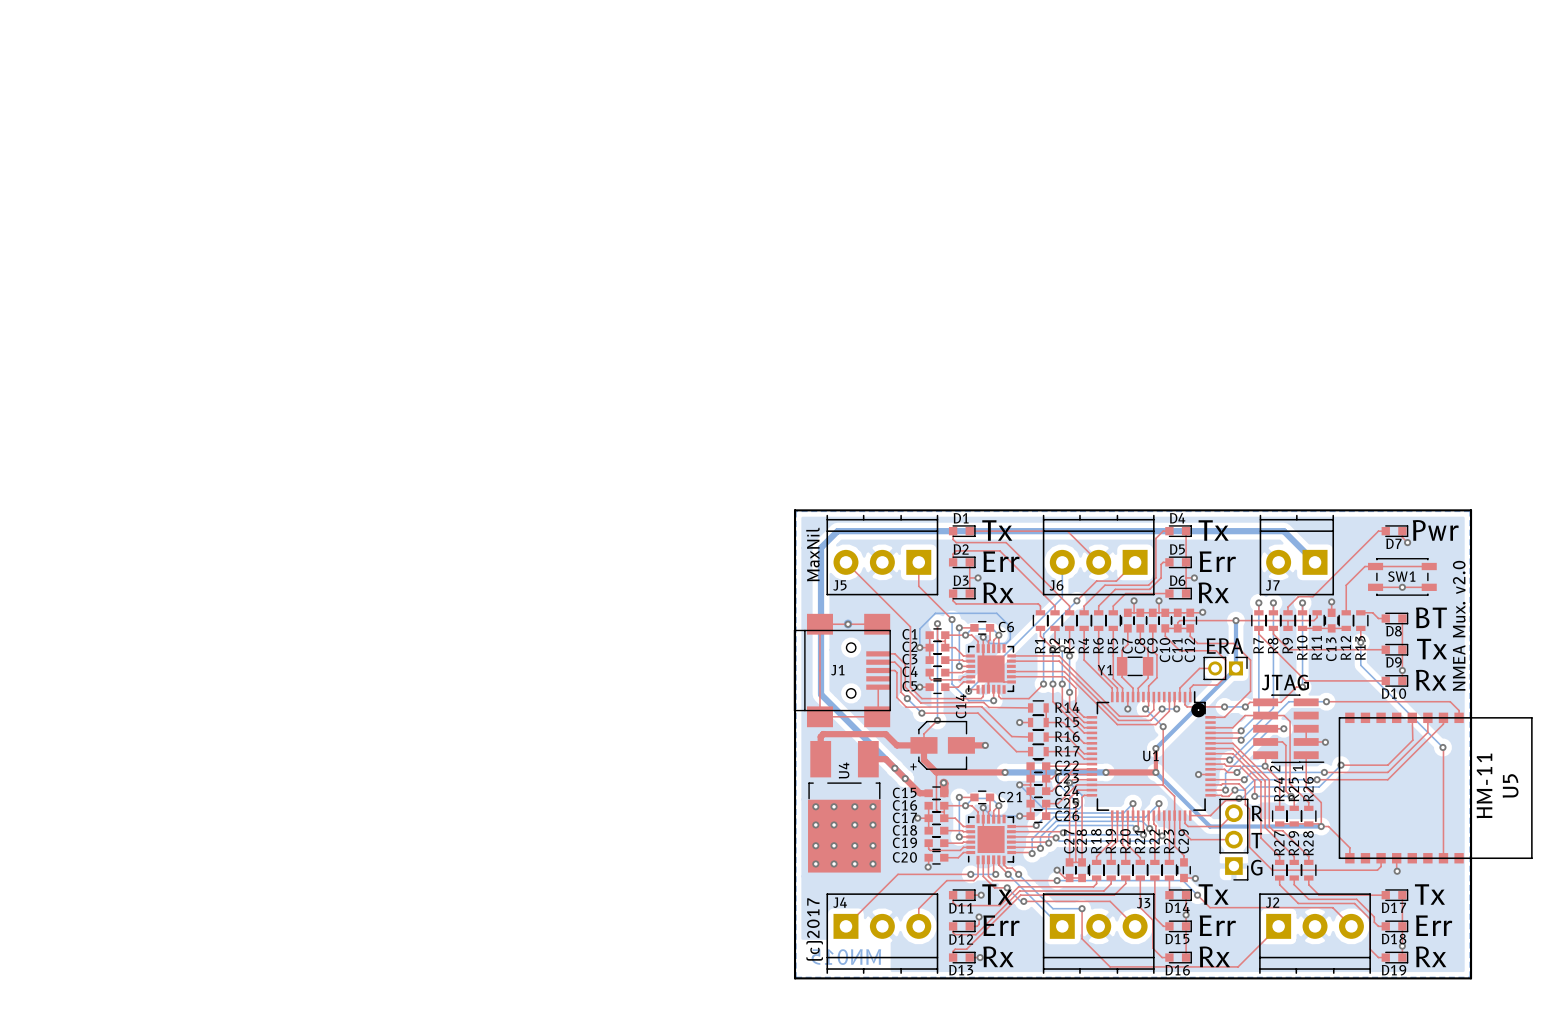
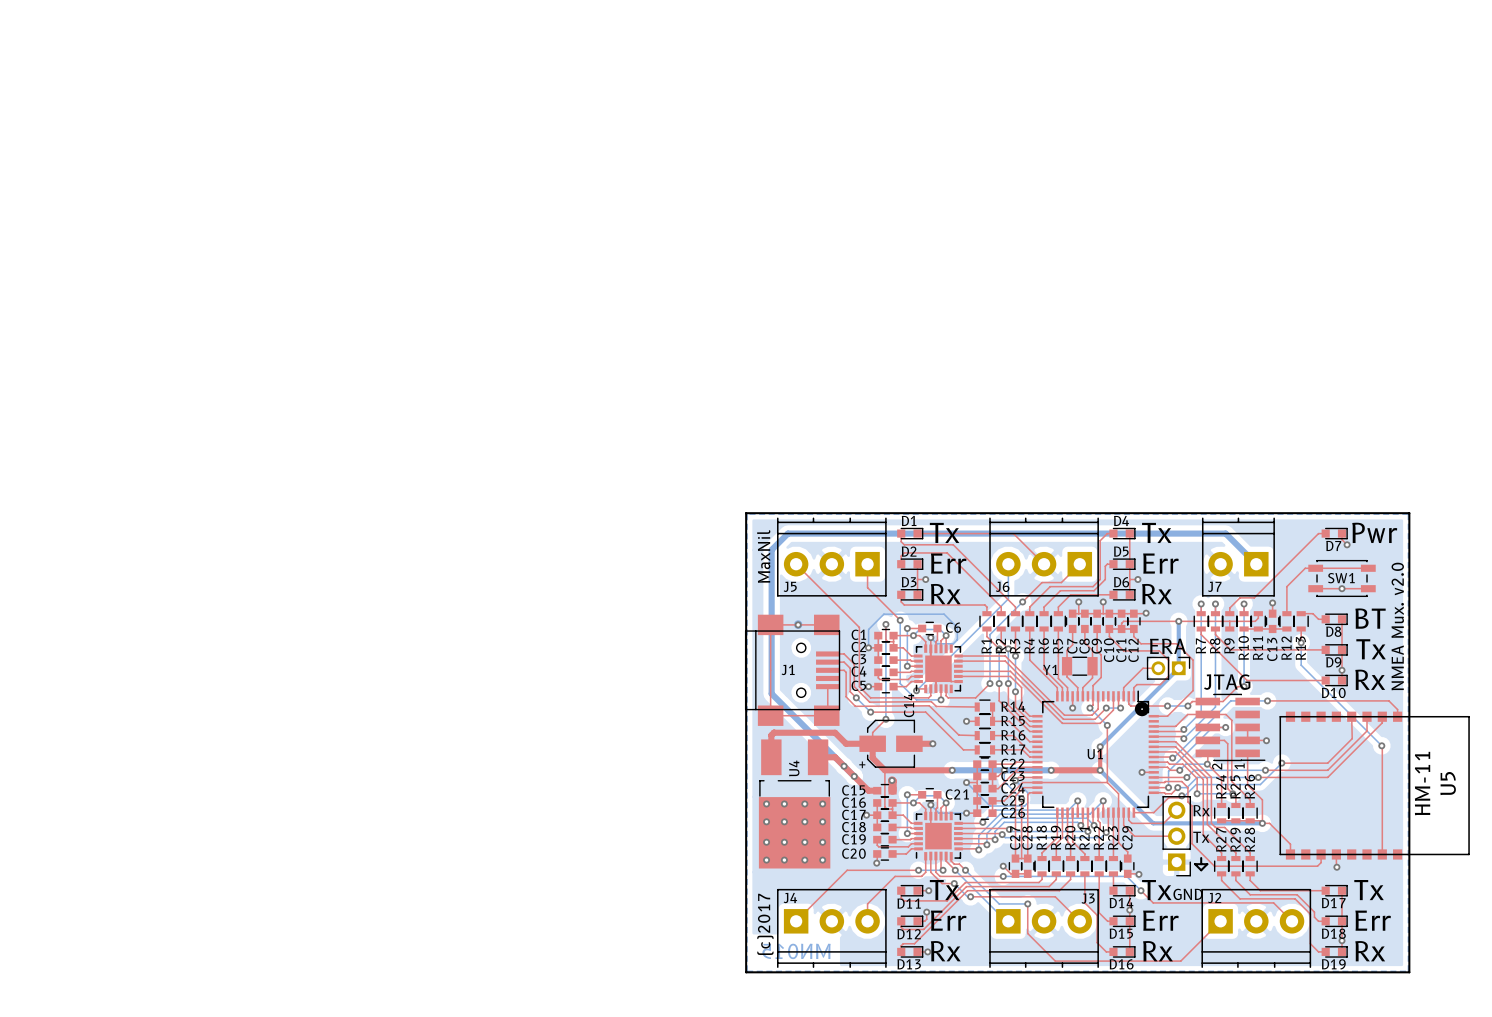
text: R (1257, 813) -> Rx (1201, 810)
text: T (1256, 840) -> Tx (1201, 837)
line: none -> (1201, 858) (1201, 864)
text: G (1256, 867) -> none
line: none -> (1195, 864) (1207, 864) (1201, 870) (1195, 864)
text: none -> GND (1188, 894)

